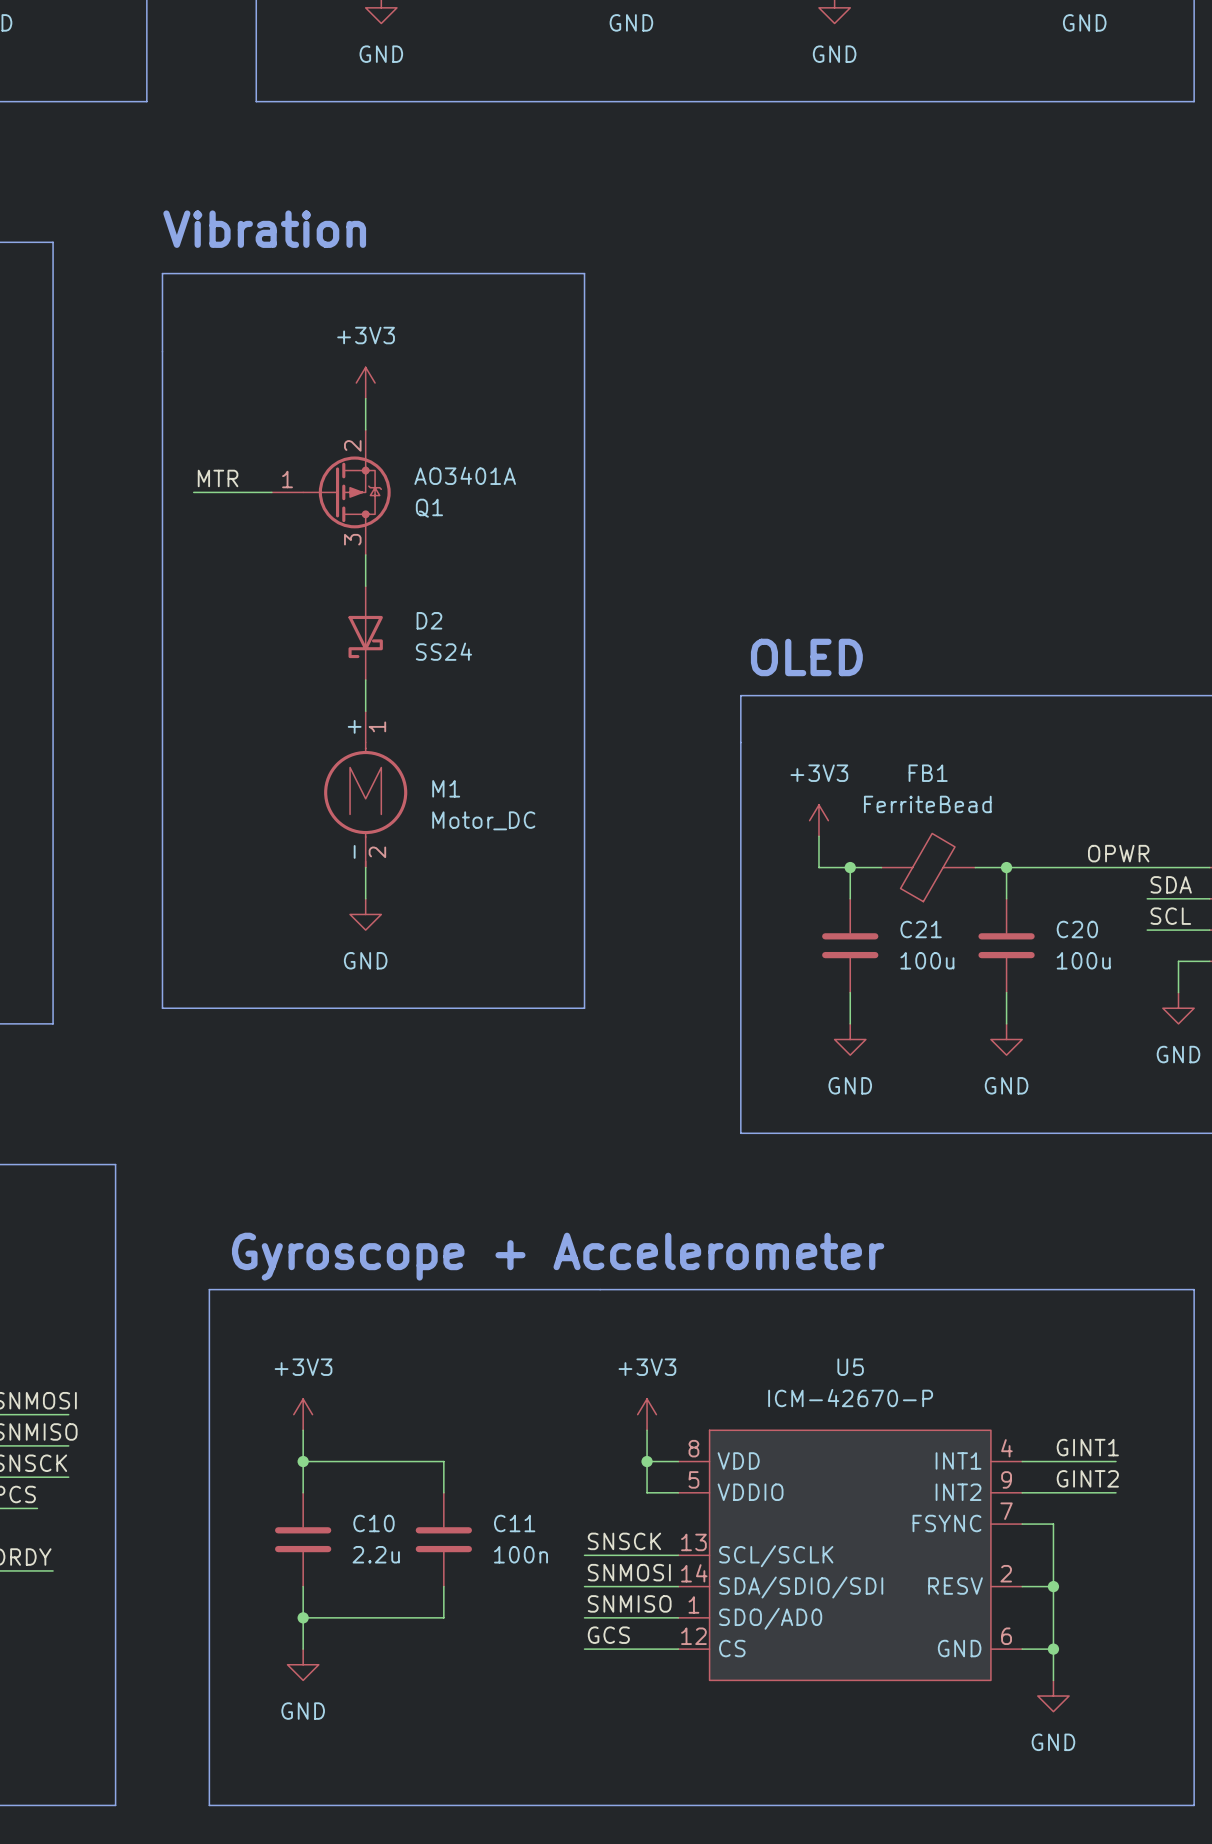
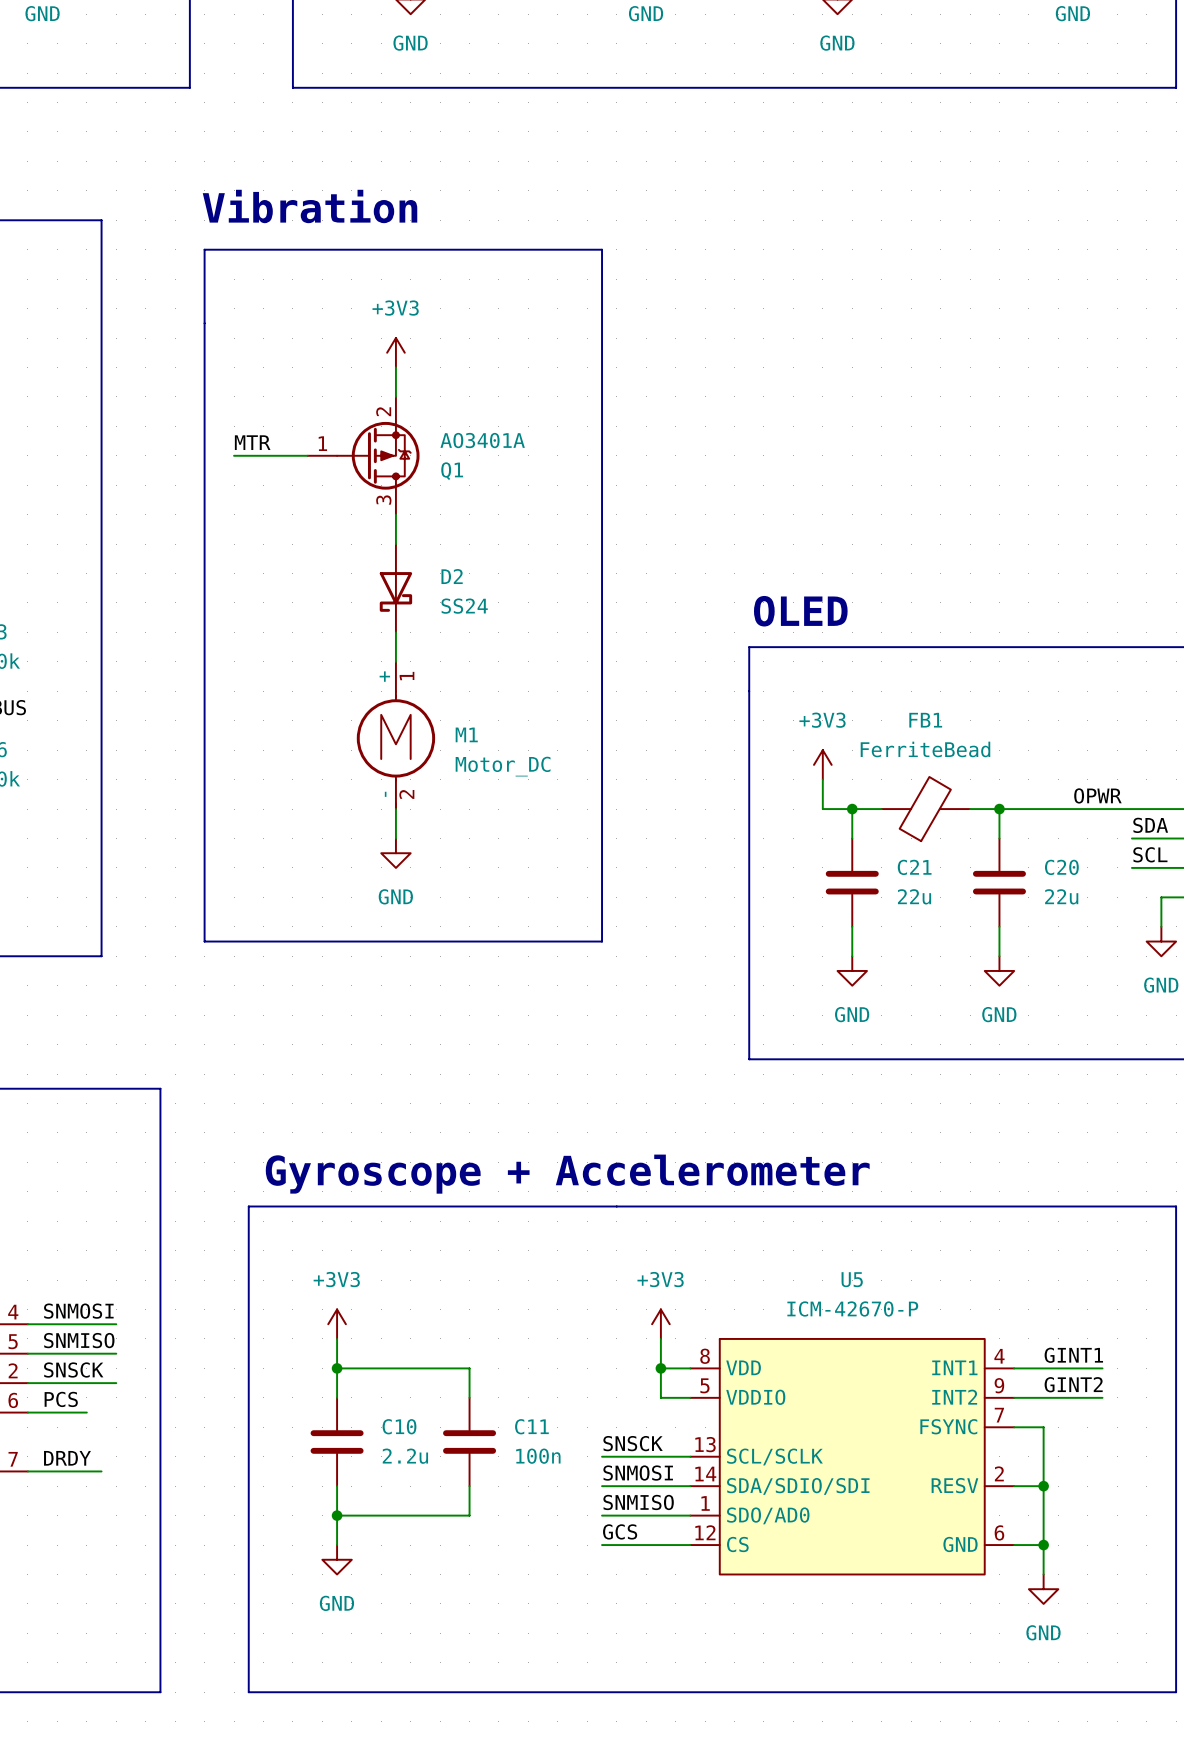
C21 value: 100u (927, 960) -> 22u (914, 896)
C20 value: 100u (1083, 960) -> 22u (1061, 896)

